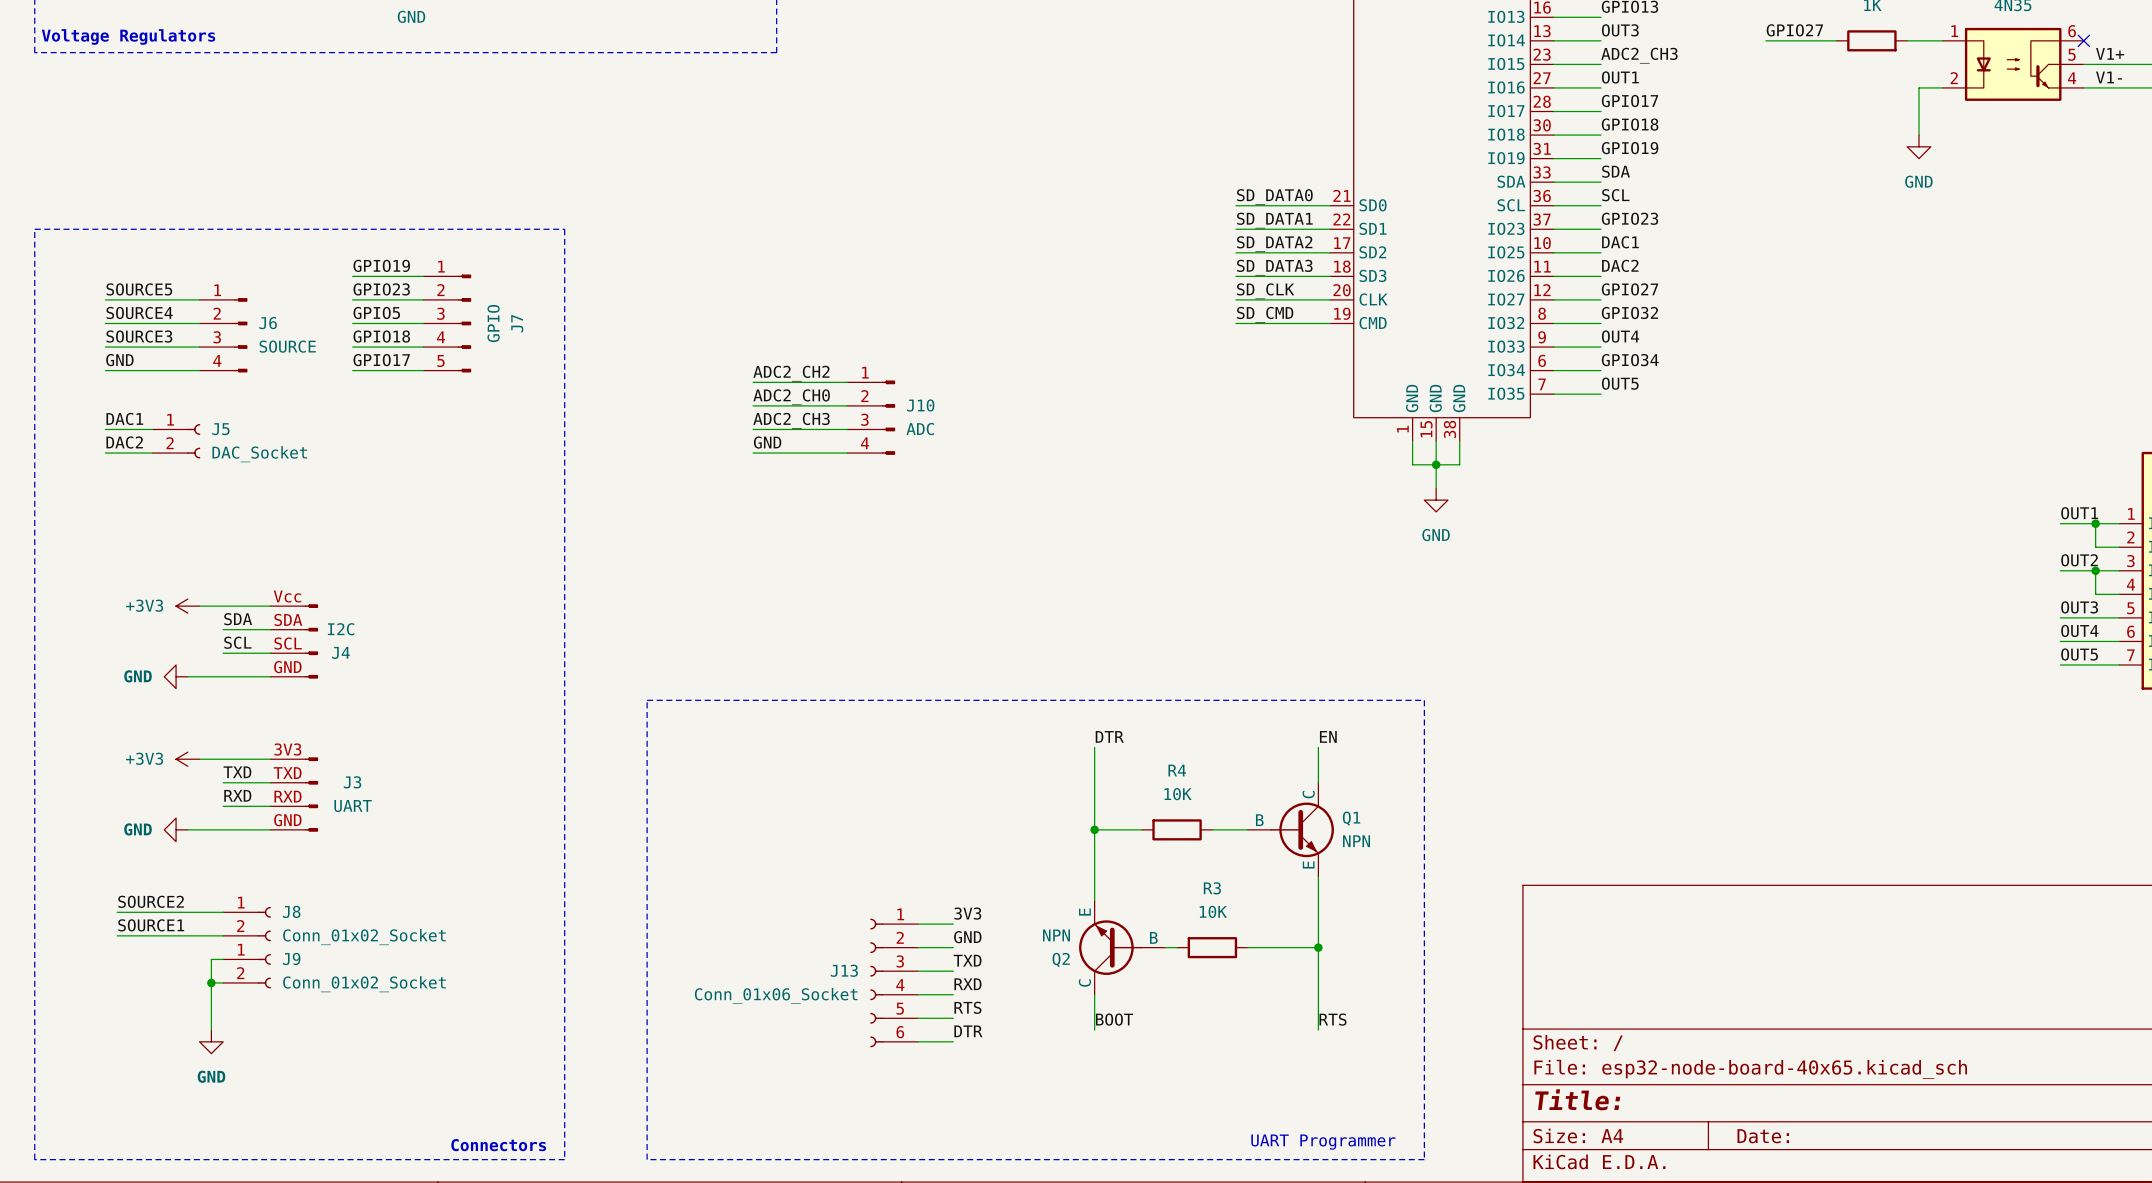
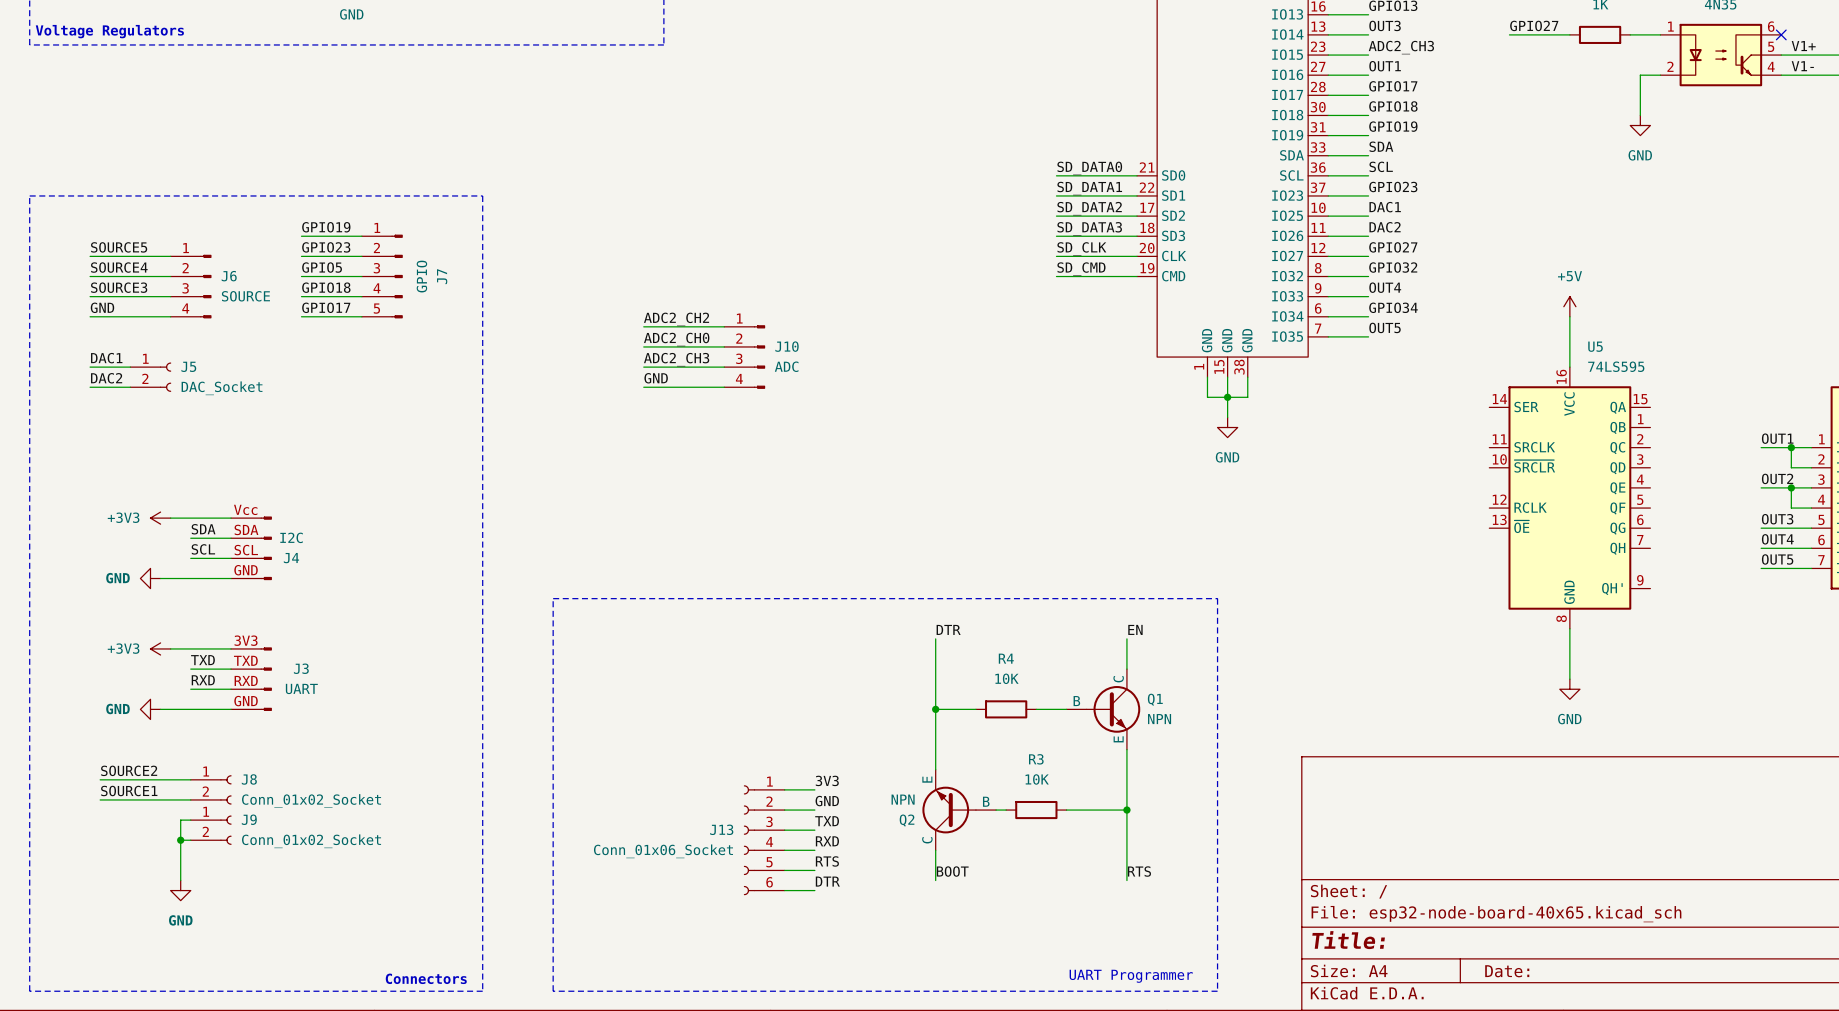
power symbol: none -> +5V (1569, 306)
wire: none -> (1569, 316) (1569, 367)
U5: none -> 74LS595 (1569, 497)
wire: none -> (1569, 628) (1569, 679)
power symbol: none -> GND (1569, 689)

